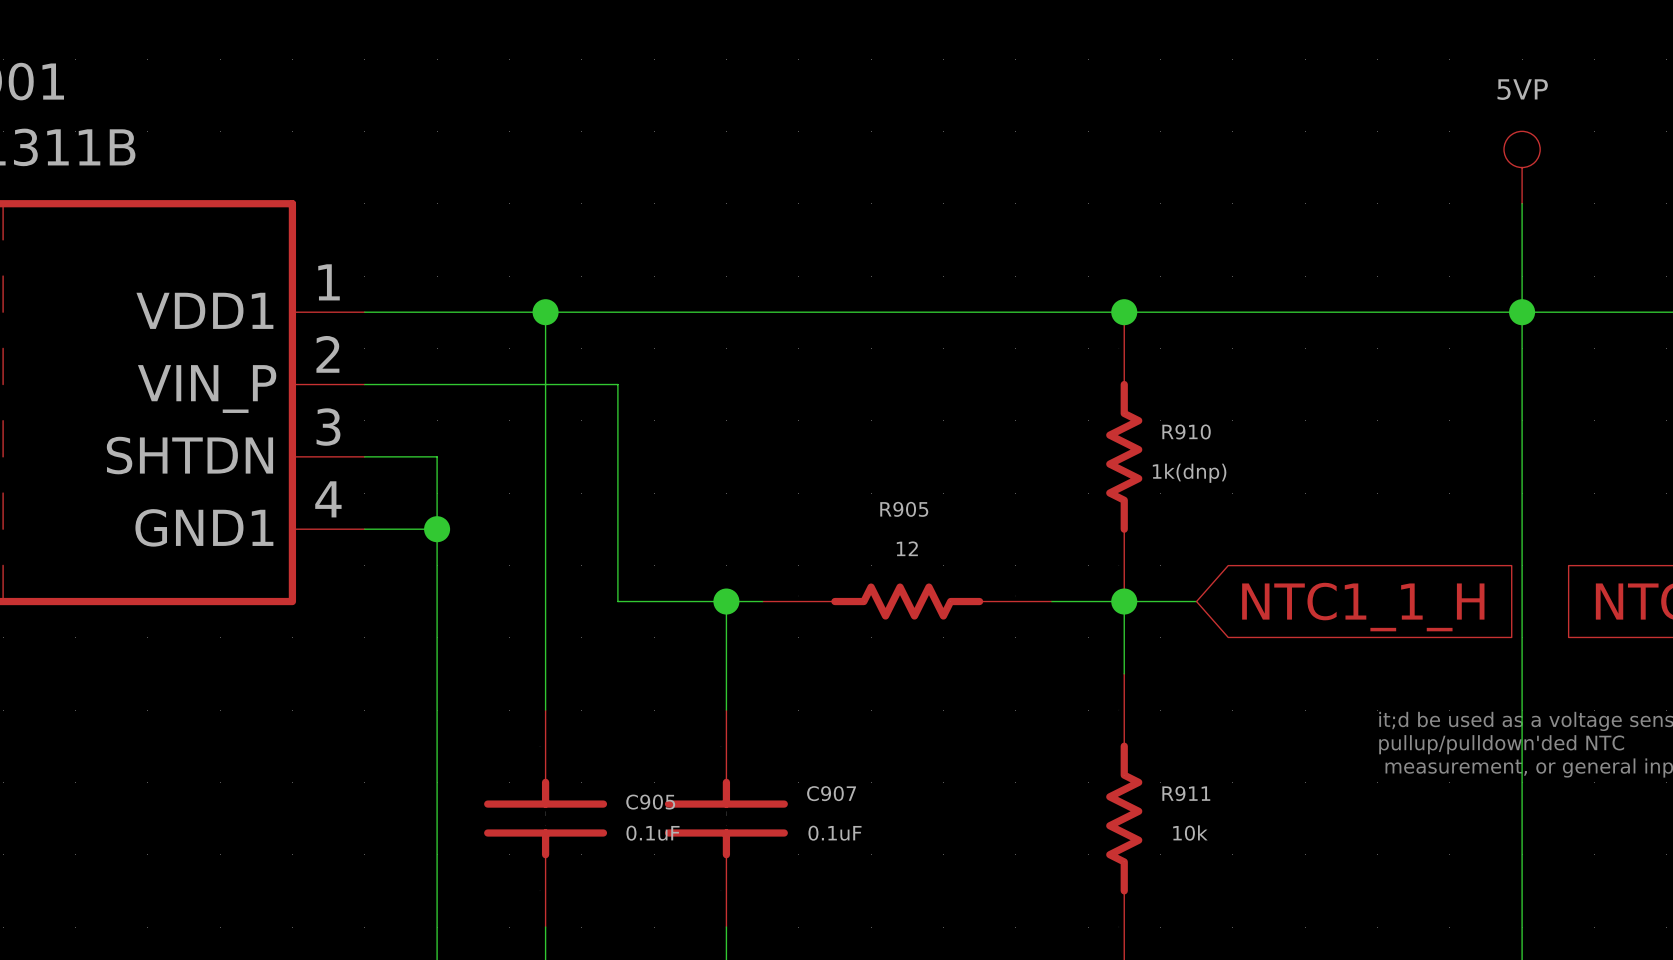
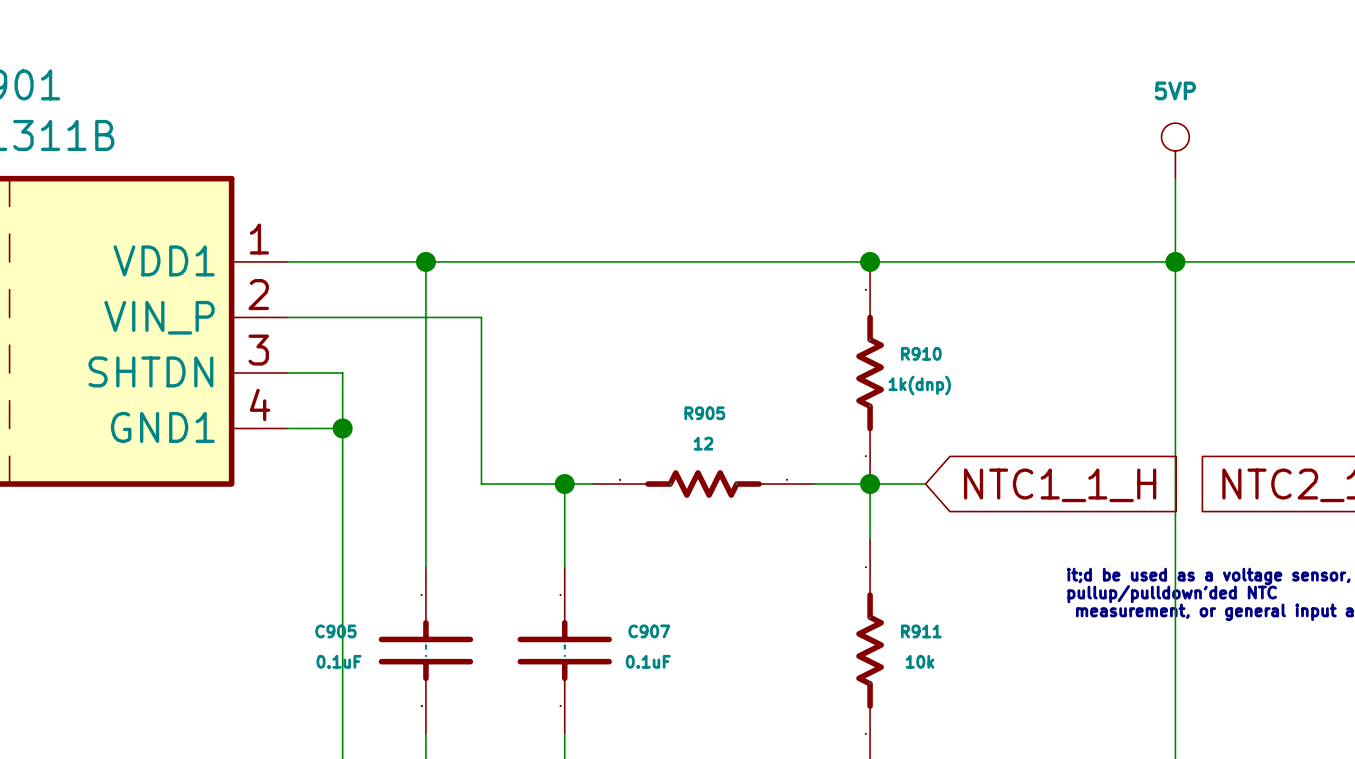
C905 name position: C905 (650, 802) -> C905 (335, 631)
C905 value position: 0.1uF (653, 833) -> 0.1uF (339, 661)

